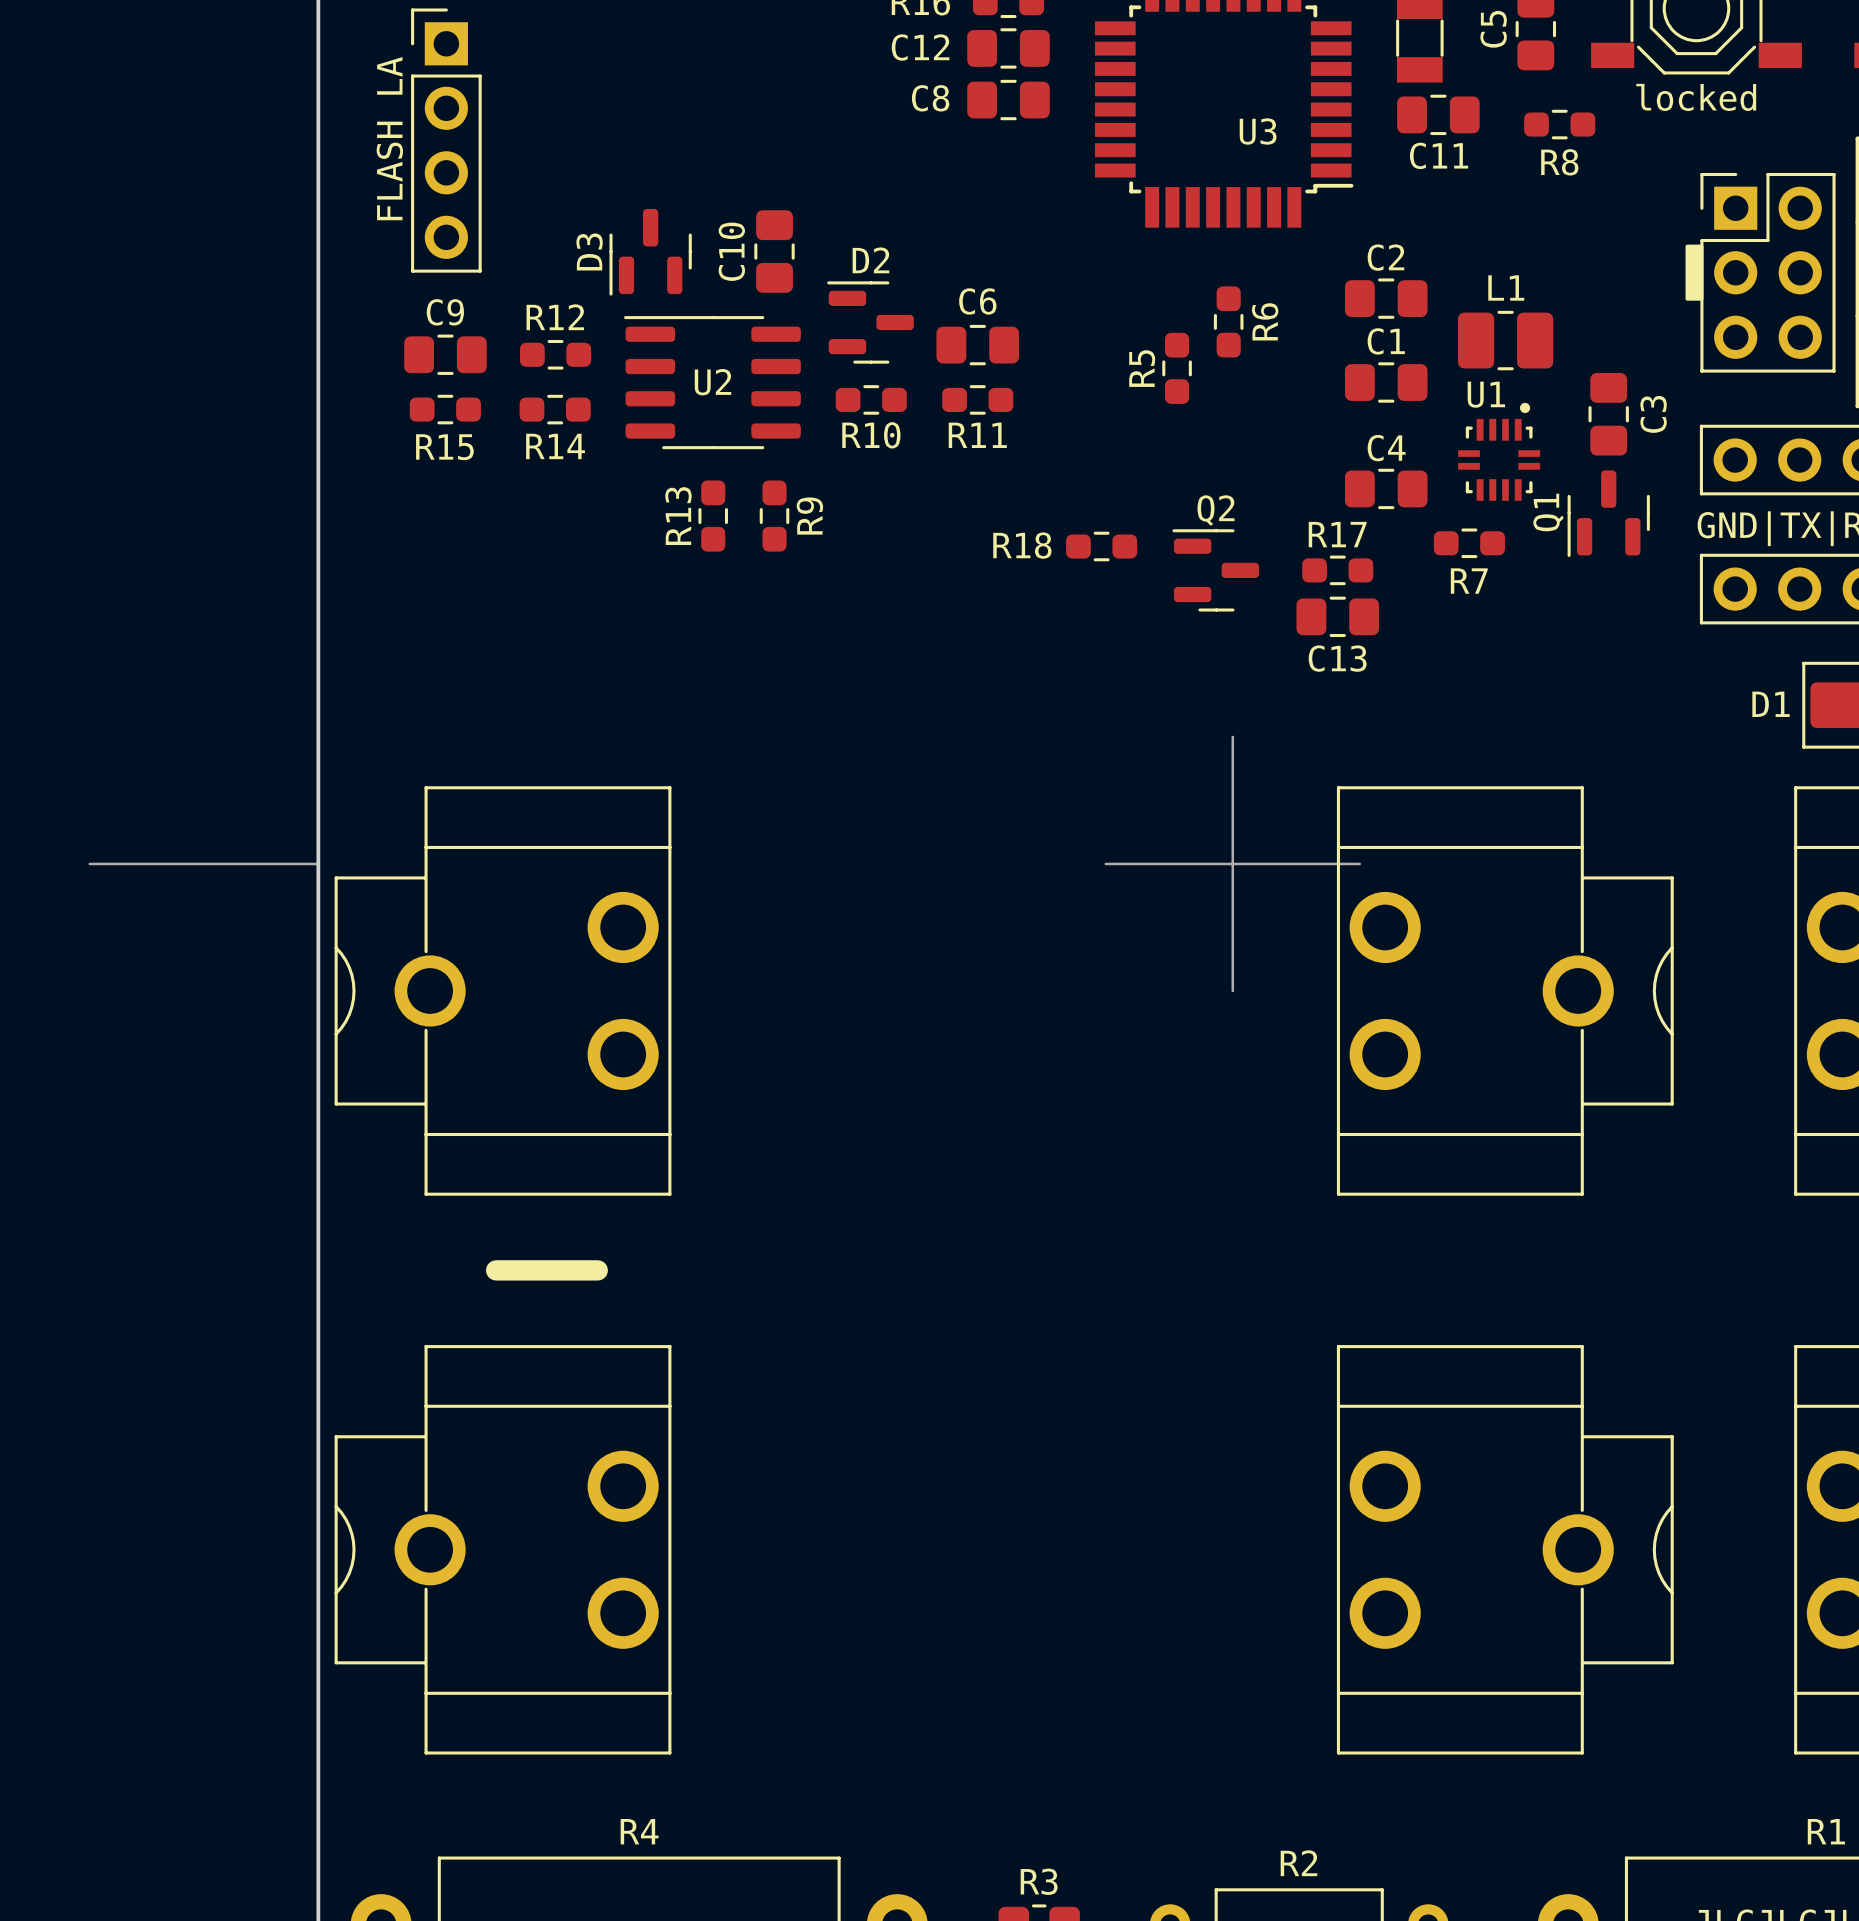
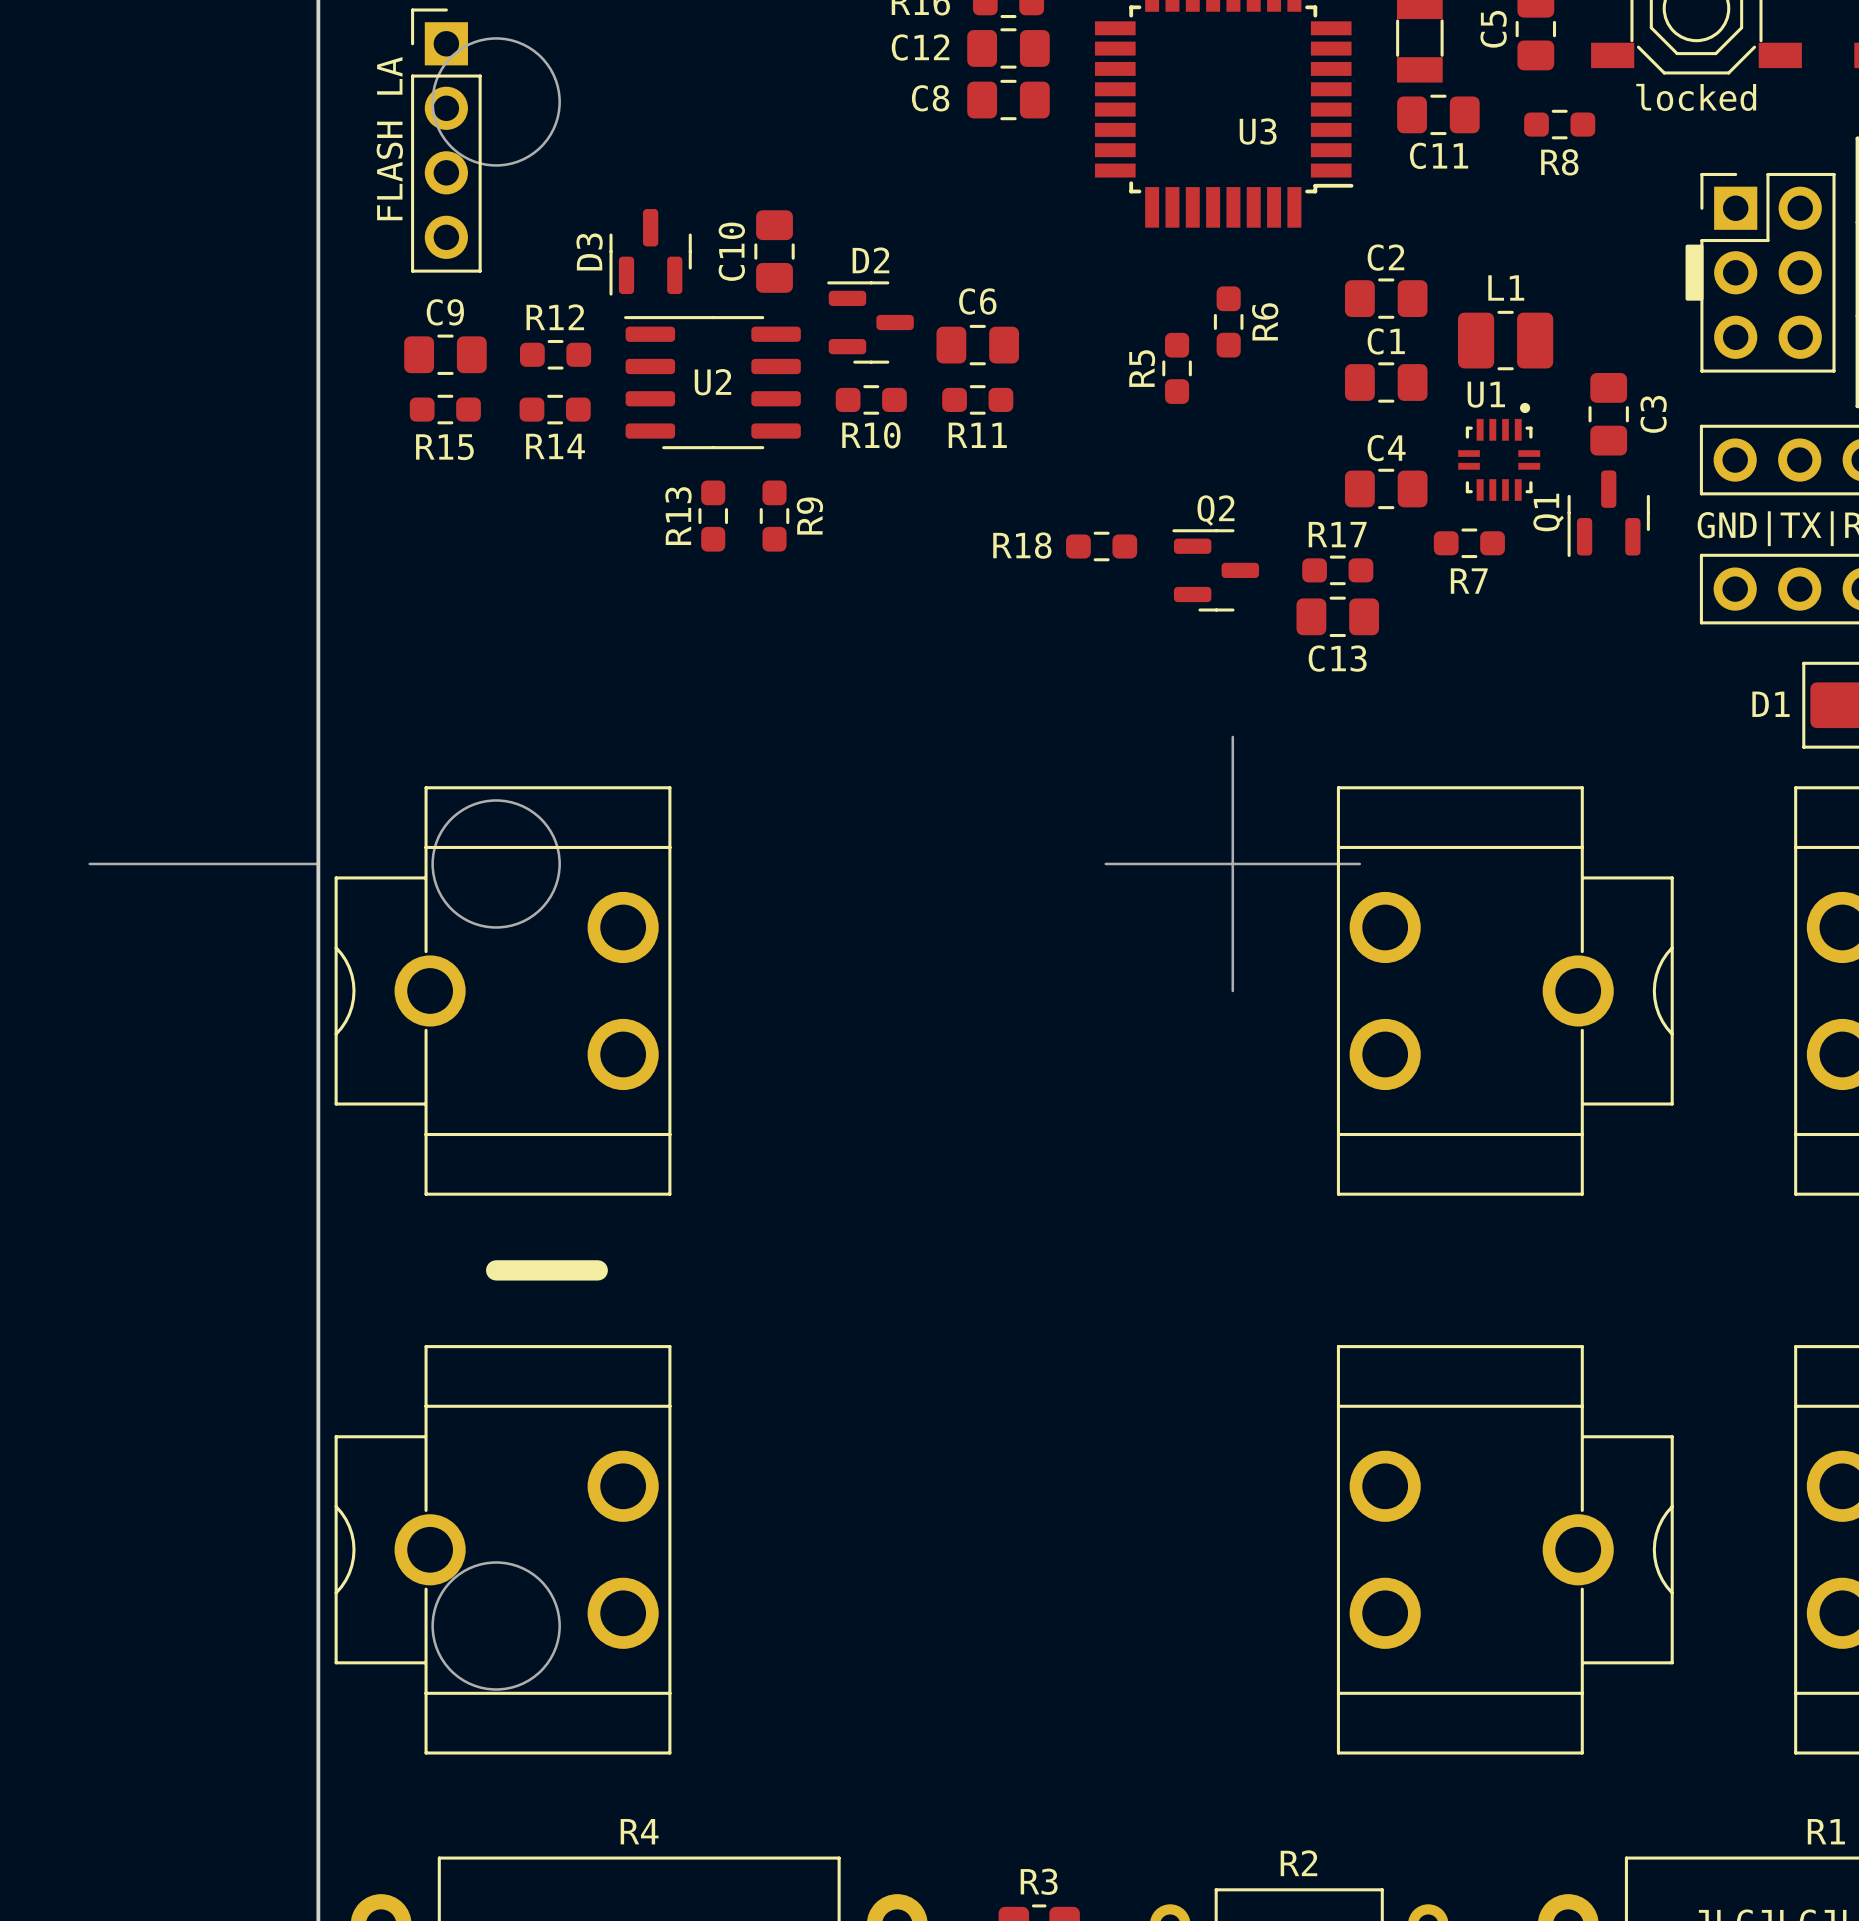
drawing: none -> [431, 37, 561, 167]
drawing: none -> [431, 799, 561, 929]
drawing: none -> [431, 1561, 561, 1691]

